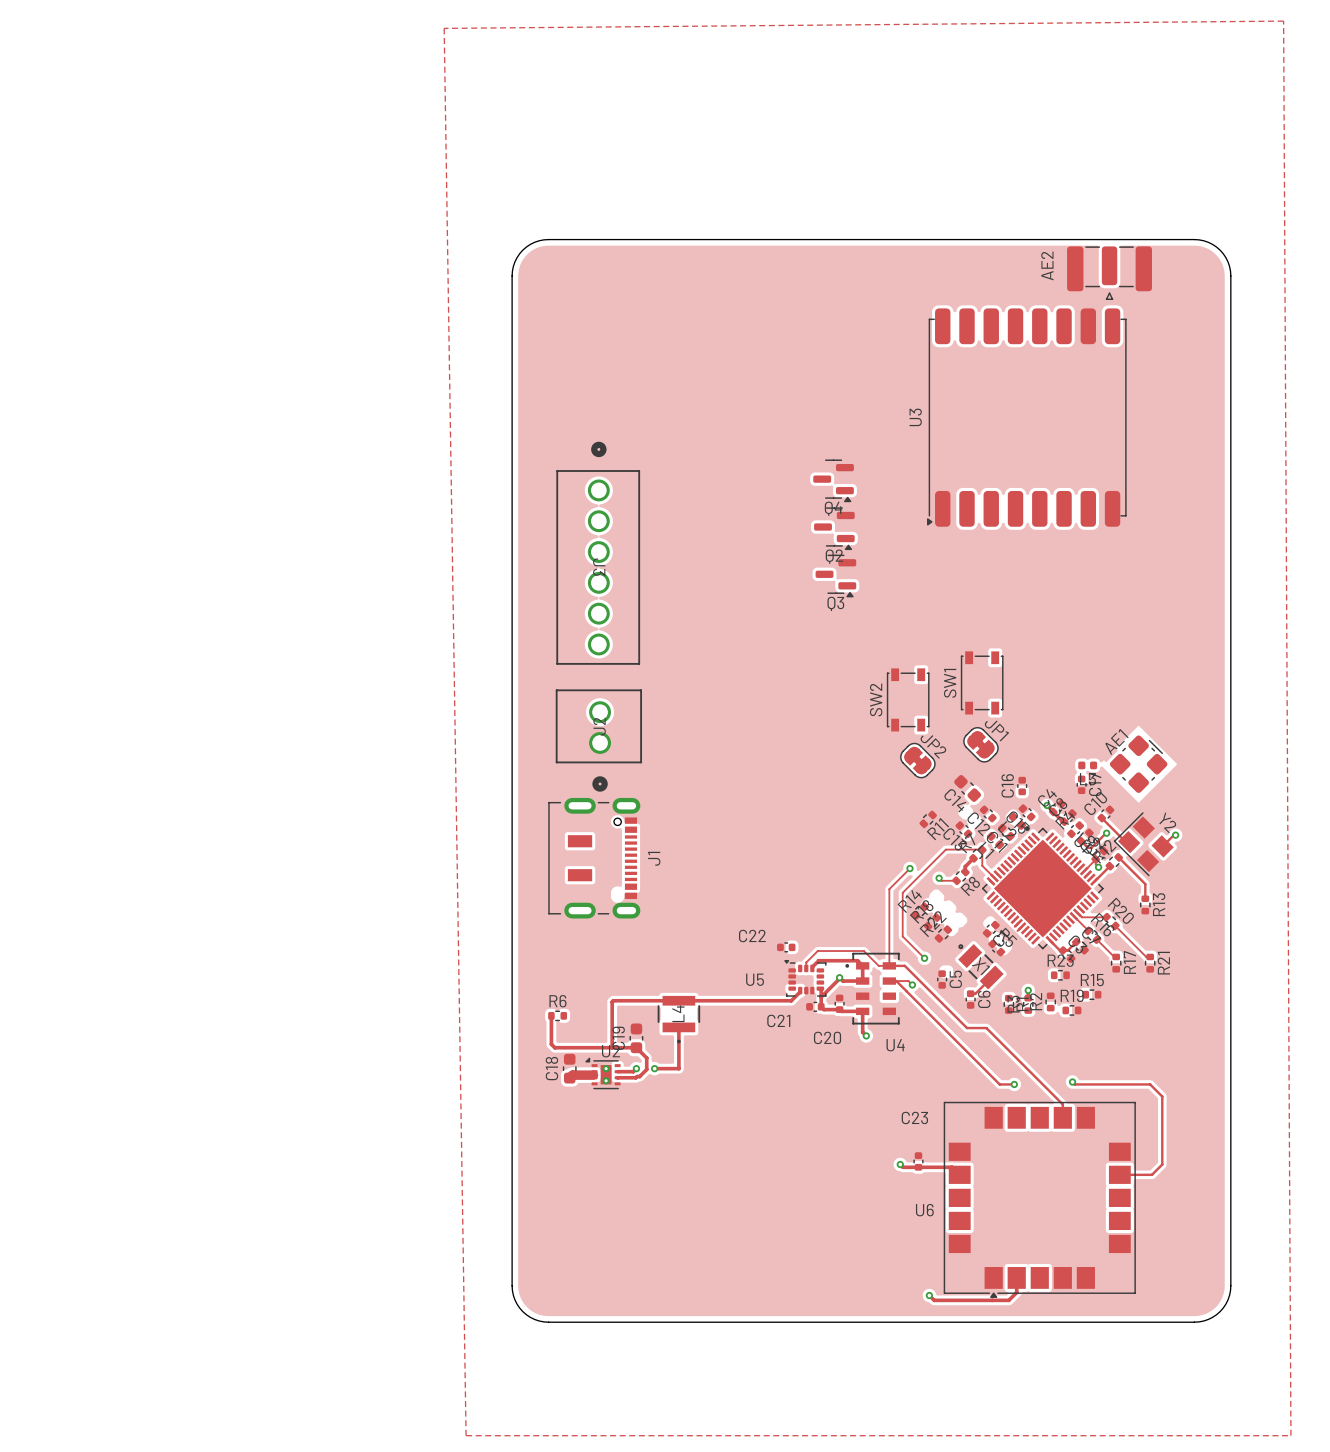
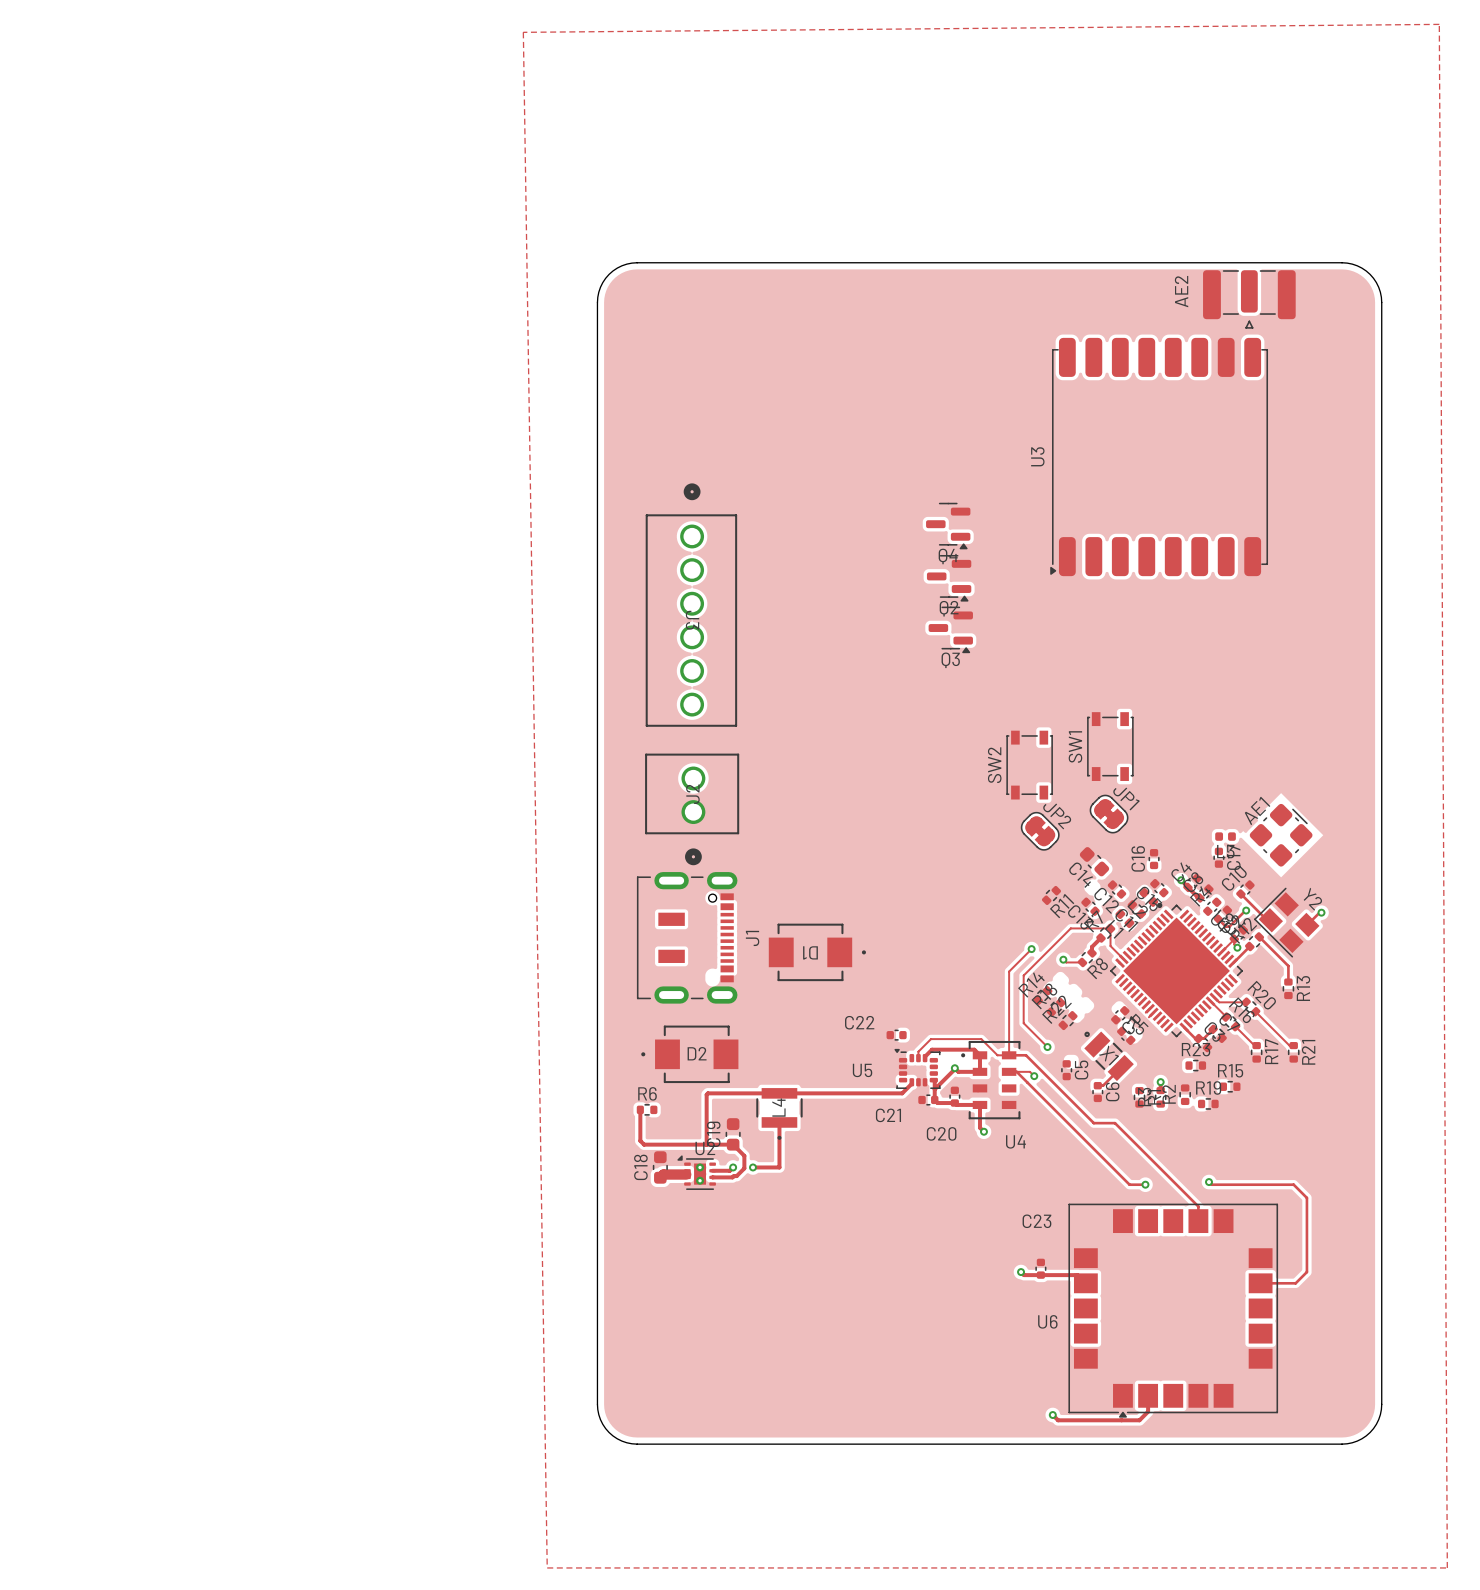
D1: none -> (817, 952)
D2: none -> (689, 1054)

